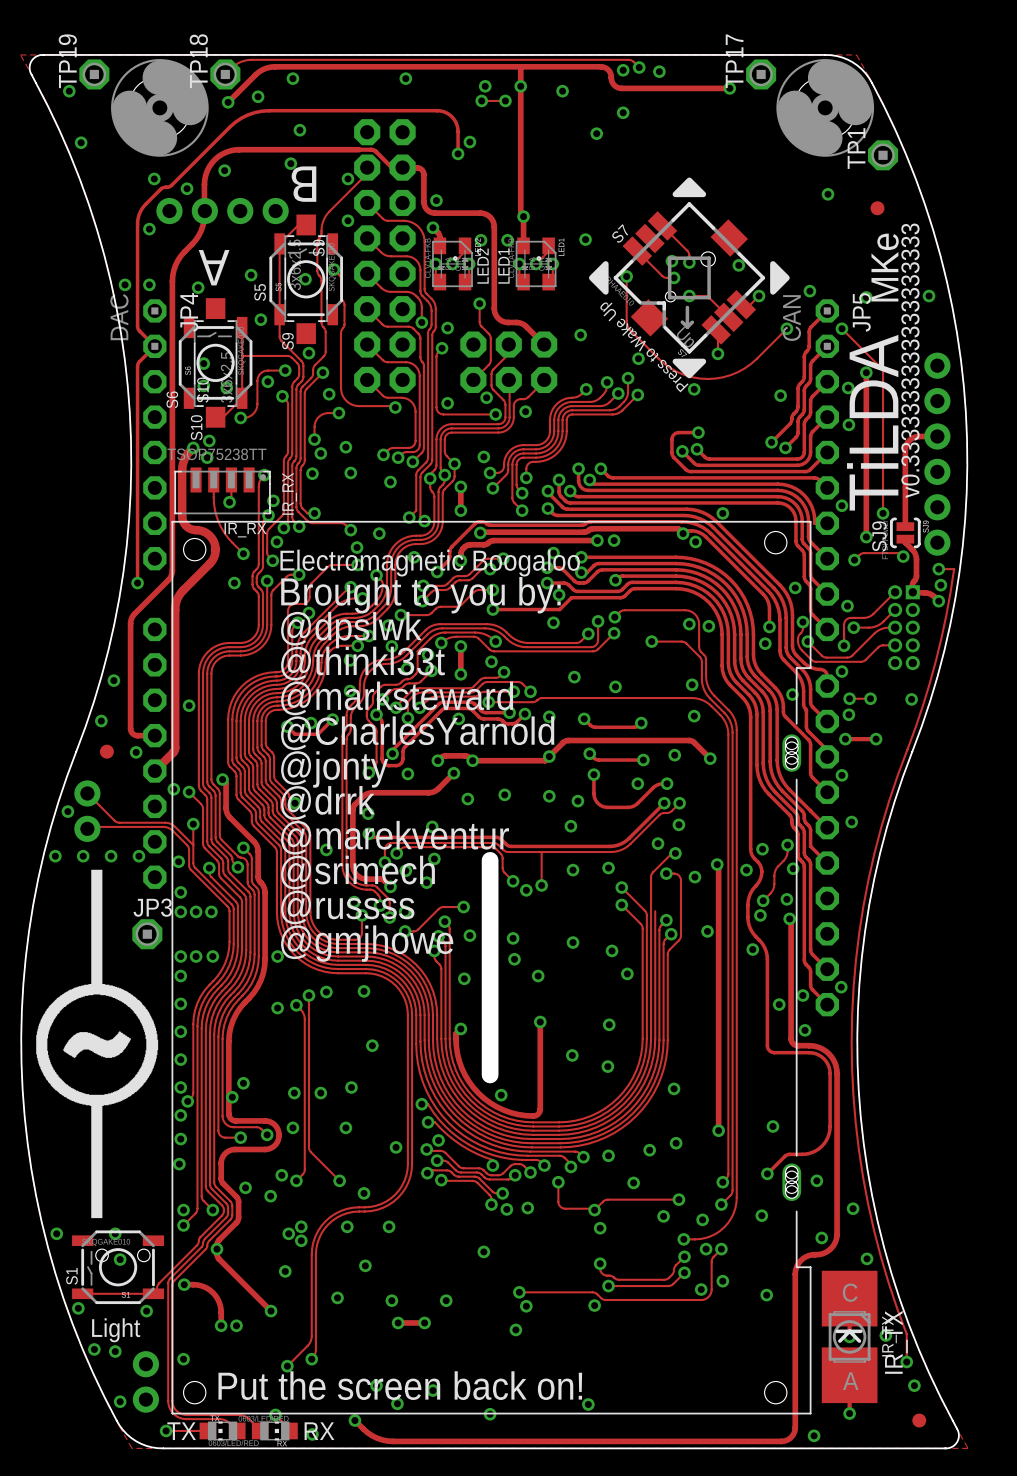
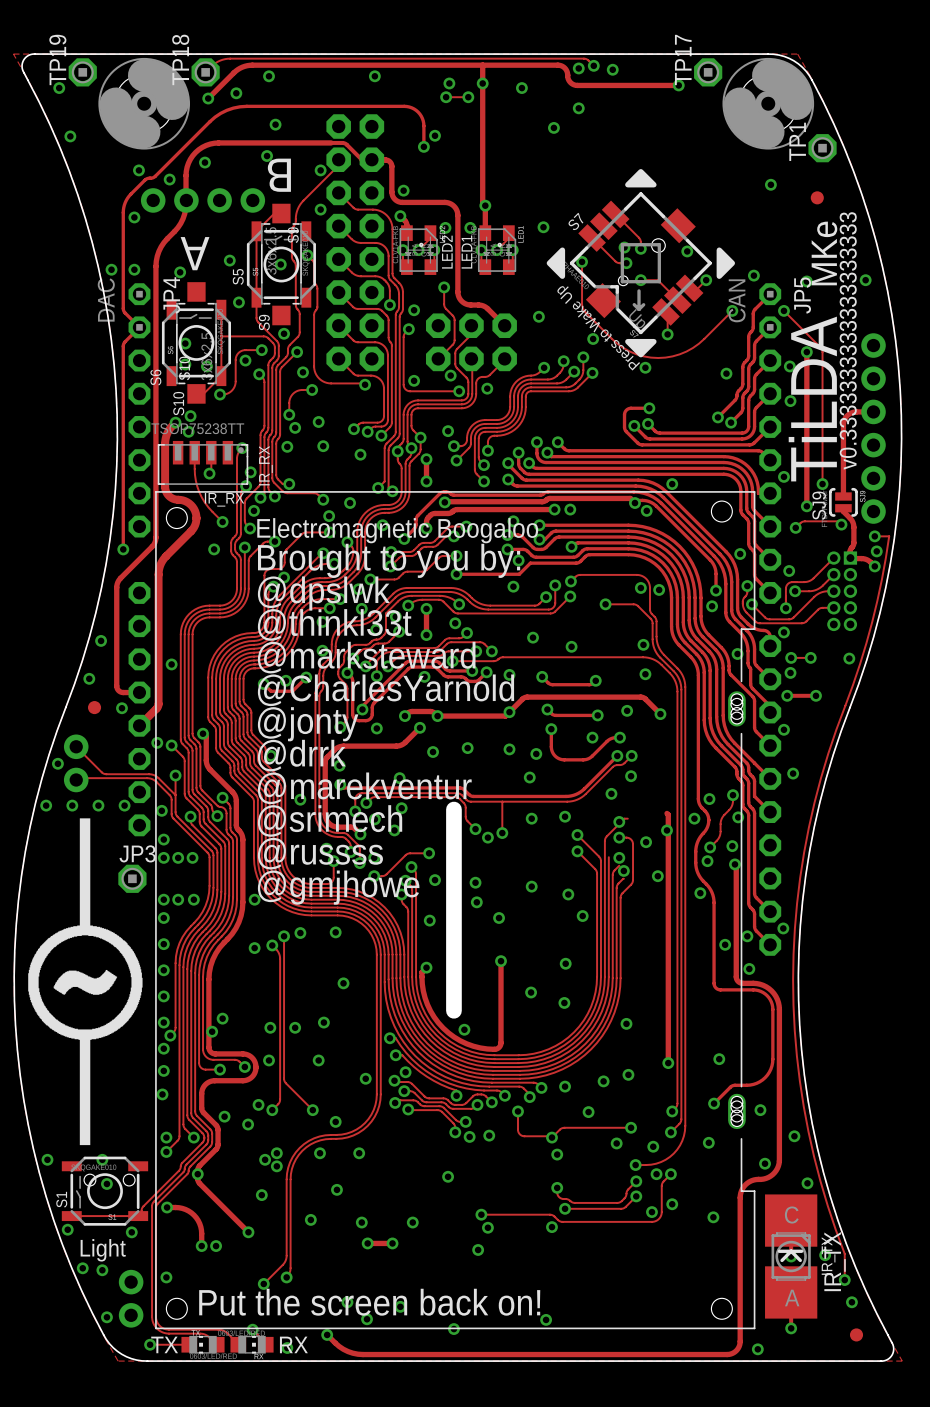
track: (675, 853) (670, 854) (651, 873) (651, 893) -> (627, 818) (624, 818) (606, 836) (604, 840)
via: (675, 853) -> none
via: (717, 864) -> none
track: (666, 873) (675, 873) (680, 877) (681, 897) -> (619, 837) (628, 838) (633, 844)
via: (694, 877) -> none
via: none -> (666, 830)
via: none -> (619, 837)
via: none -> (646, 842)
via: none -> (619, 857)
via: (666, 920) -> none
via: none -> (623, 870)
via: (671, 934) -> none

